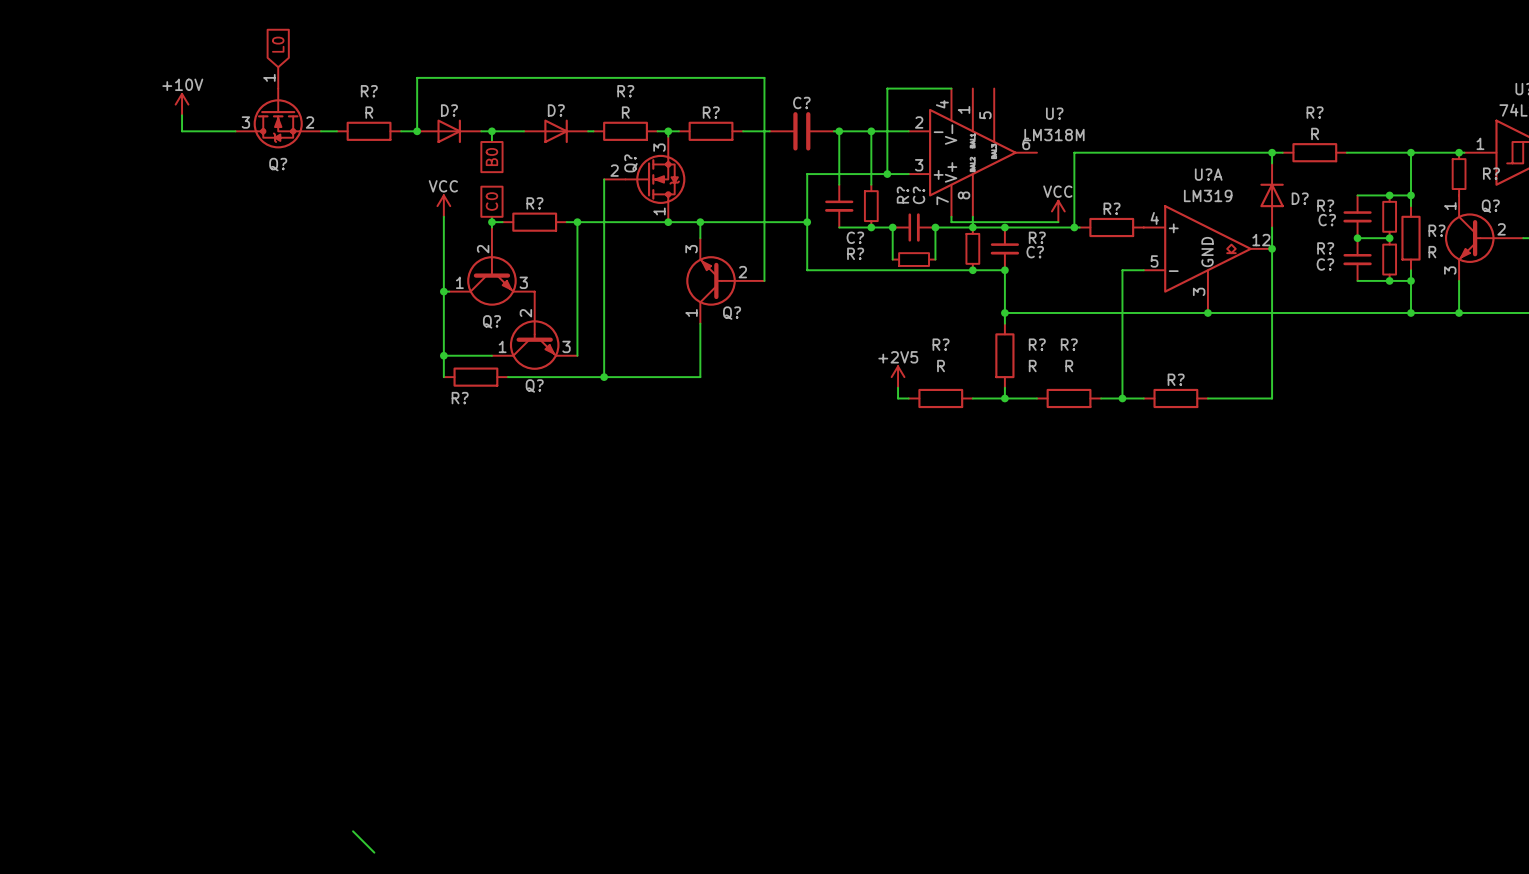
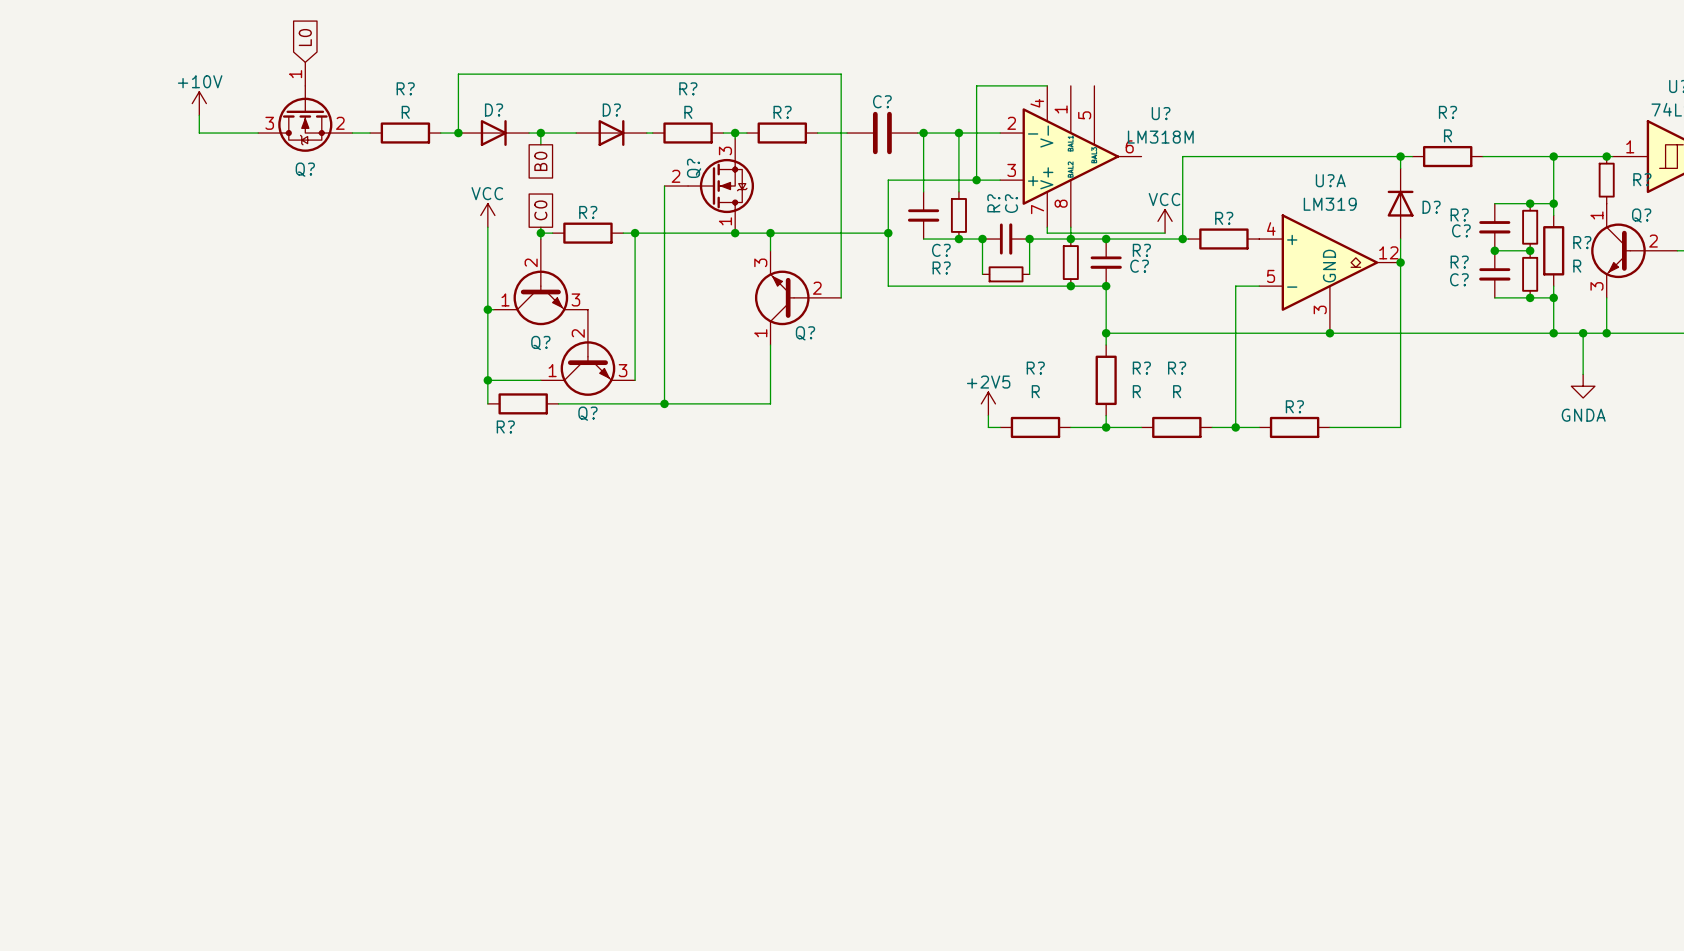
wire: none -> (1583, 333) (1583, 374)
junction: none -> (1583, 333)
power symbol: none -> GNDA (1583, 386)
wire: (353, 831) (374, 852) -> none

